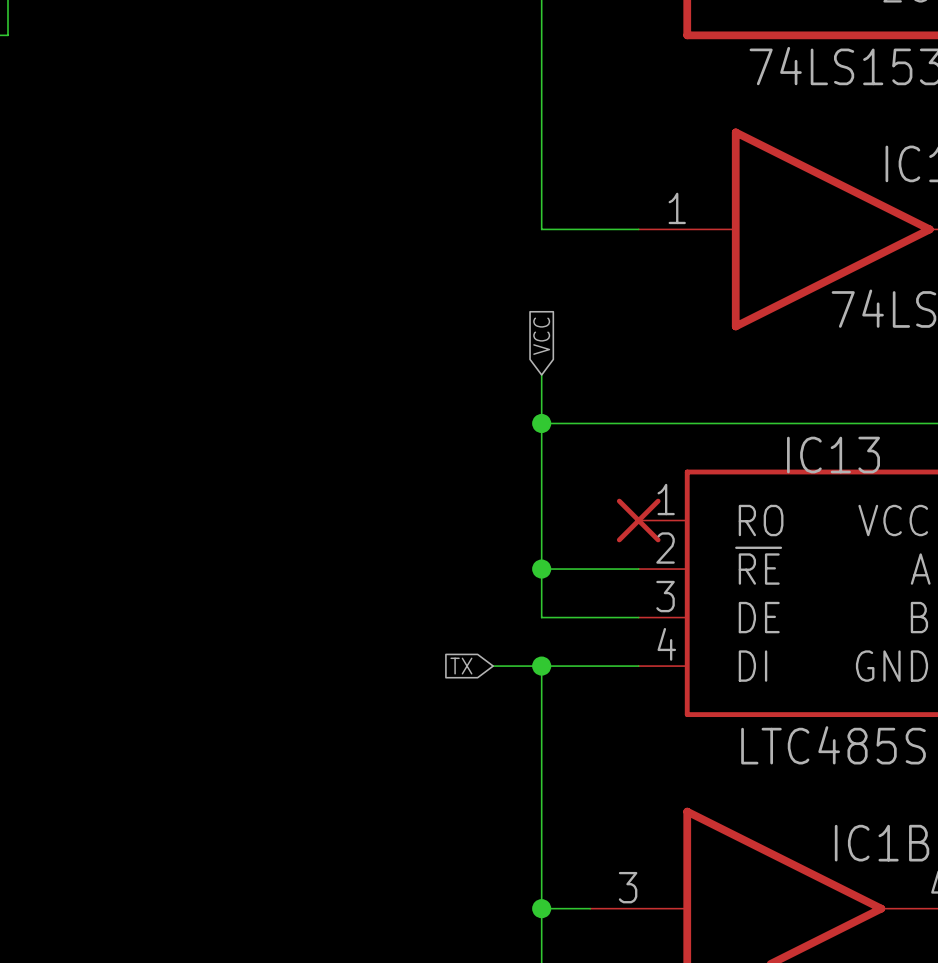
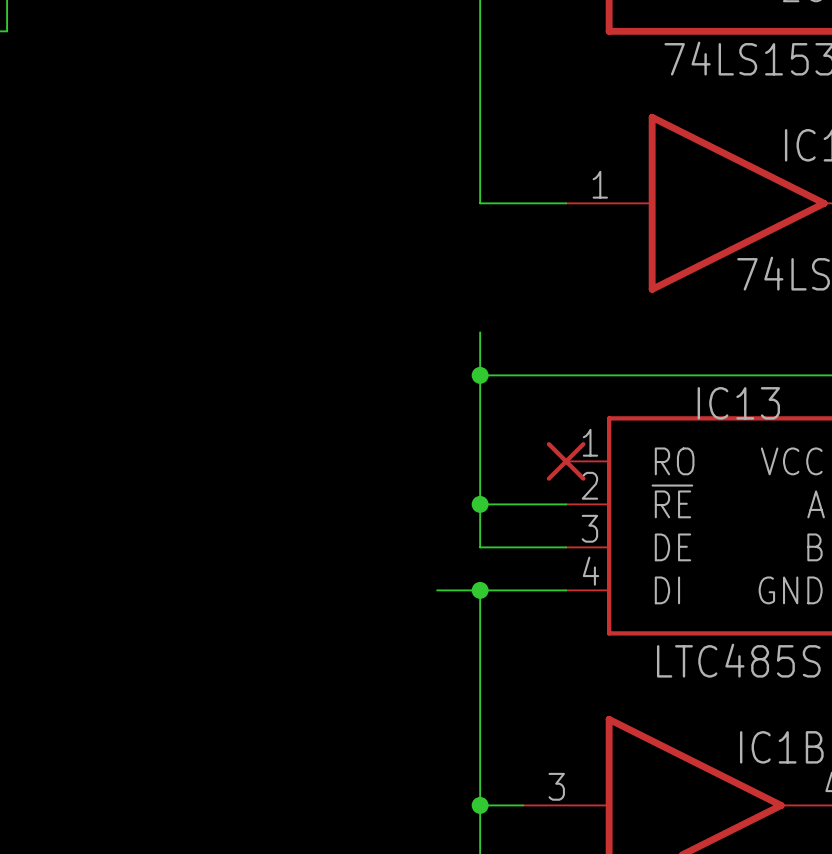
global label: VCC (541, 336) -> none
global label: TX (461, 666) -> none

